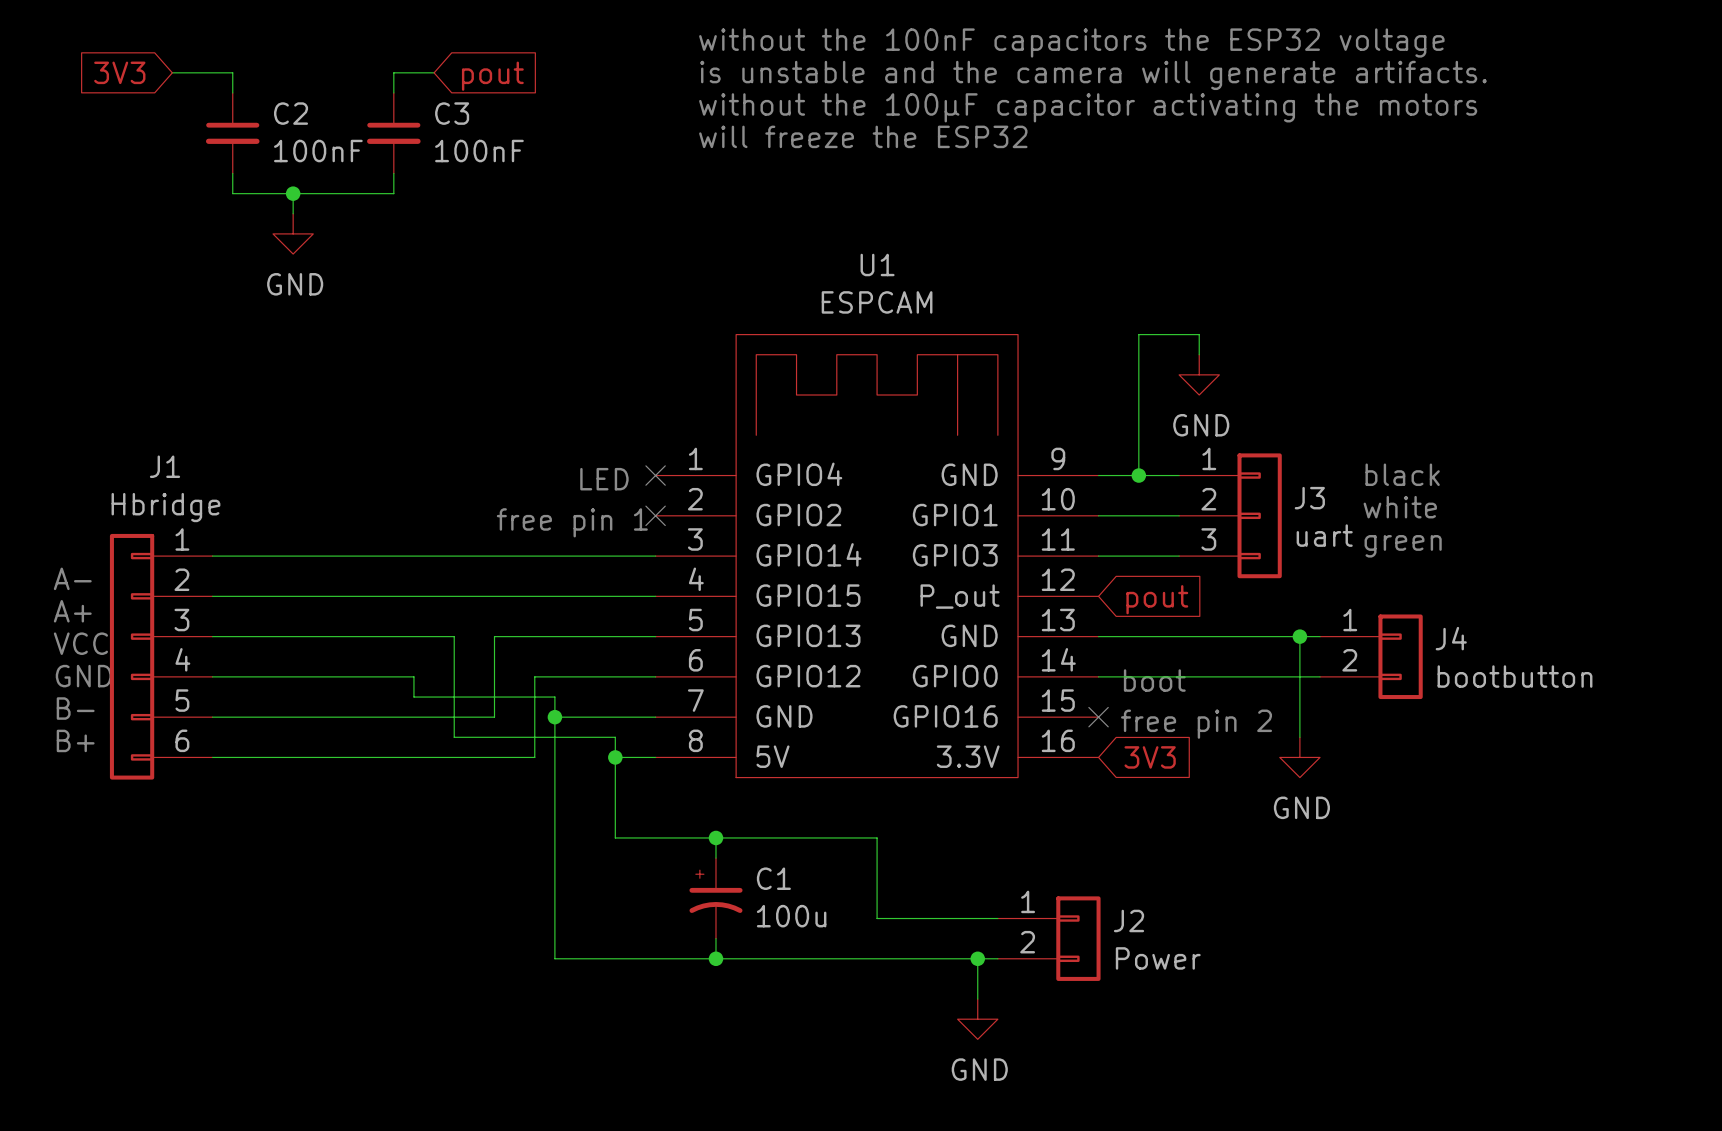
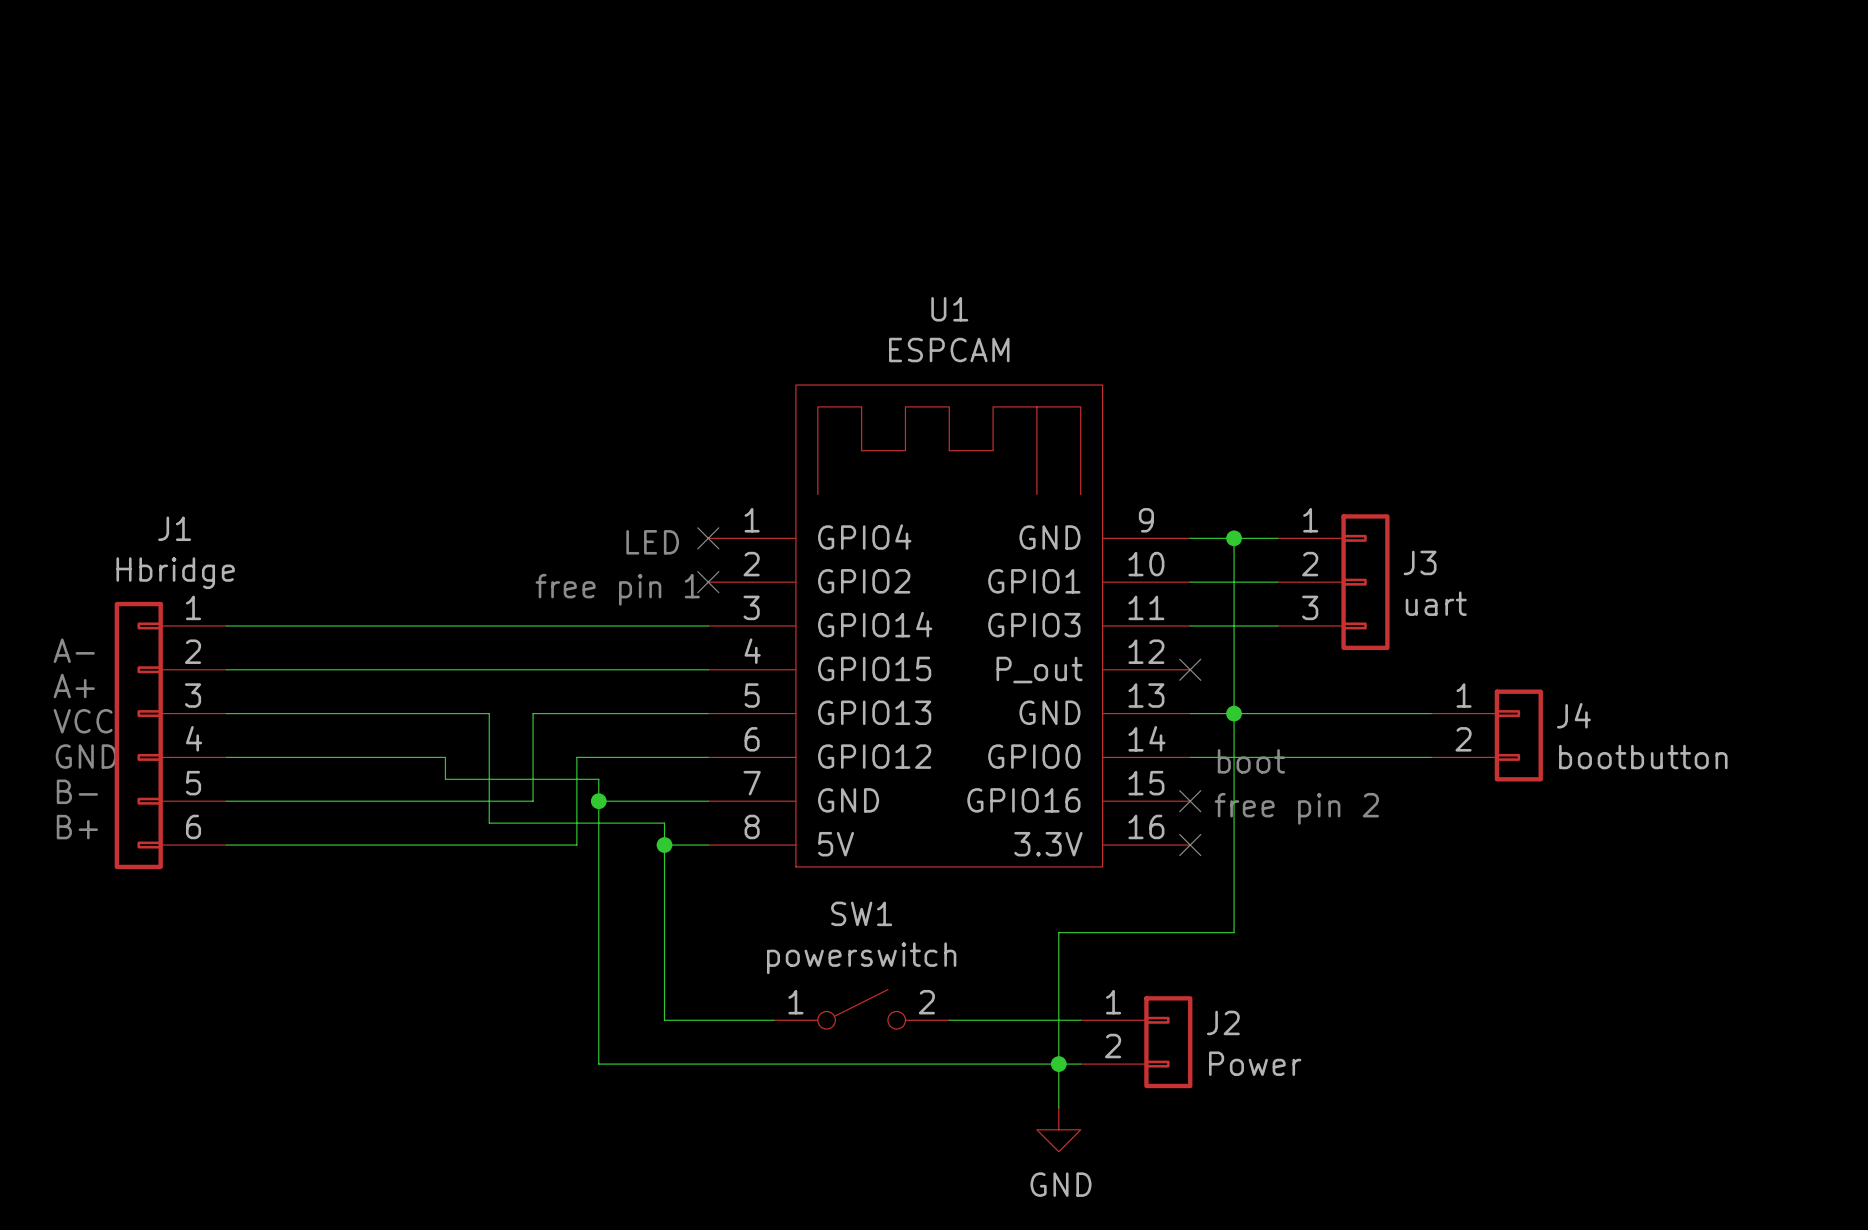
text: without the 100nF capacitors the ESP32 voltage (1071, 42) -> none
global label: 3V3 (119, 72) -> none
wire: (172, 72) (232, 72) (232, 92) -> none
wire: (434, 72) (393, 72) (393, 92) -> none
text: is unstable and the camera will generate artifacts. (1093, 75) -> none
global label: pout (492, 76) -> none
text: without the 100µF capacitor activating the motors (1088, 107) -> none
C2: 100nF (232, 133) -> none
C3: 100nF (393, 133) -> none
text: will freeze the ESP32 (863, 136) -> none
wire: (232, 173) (232, 193) (393, 193) (393, 173) -> none
wire: (293, 193) (293, 213) -> none
junction: (293, 193) -> none
power symbol: GND (293, 233) -> none
wire: (1199, 354) (1199, 334) (1138, 334) (1138, 475) -> (1058, 1064) (1058, 932) (1234, 932) (1234, 538)
power symbol: GND (1199, 374) -> none
text: black (1402, 474) -> none
text: white (1400, 507) -> none
text: green (1403, 546) -> none
no-connect mark: none -> (1190, 669)
global label: pout (1157, 599) -> none
junction: none -> (1234, 713)
wire: (1299, 636) (1299, 737) -> none
junction: (1299, 636) -> none
no-connect mark: none -> (1190, 845)
global label: 3V3 (1150, 757) -> none
power symbol: GND (1299, 757) -> none
wire: (615, 837) (877, 837) (877, 918) -> (664, 932) (664, 1020) (774, 1020)
wire: (715, 837) (715, 858) -> none
junction: (715, 837) -> none
C1: 100u (715, 898) -> none
SW1: none -> powerswitch (861, 1009)
wire: (715, 938) (715, 958) -> none
junction: (715, 958) -> none

